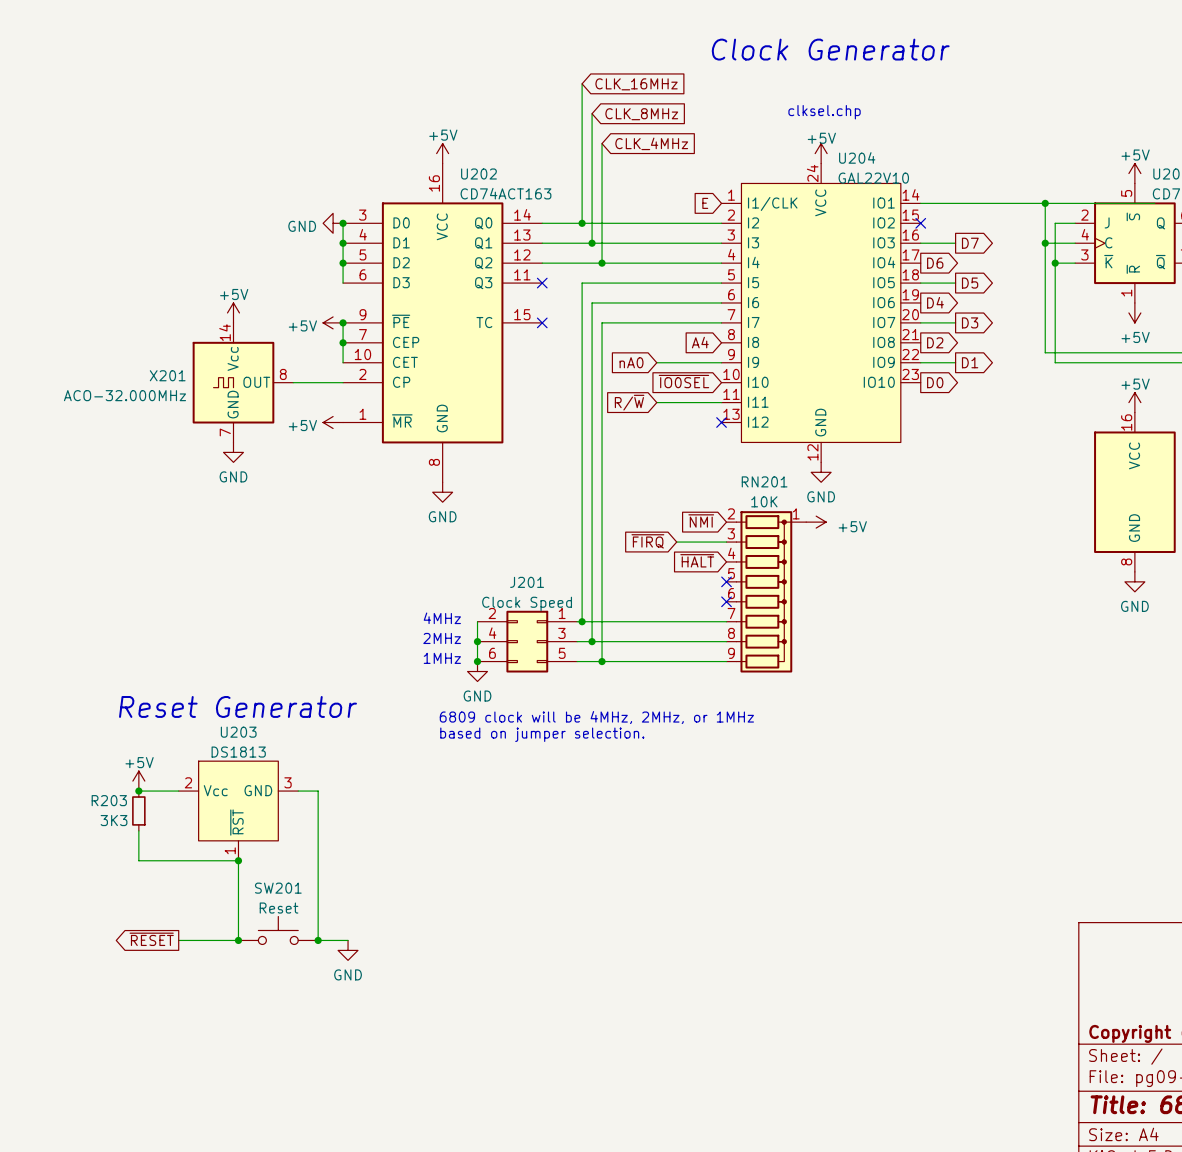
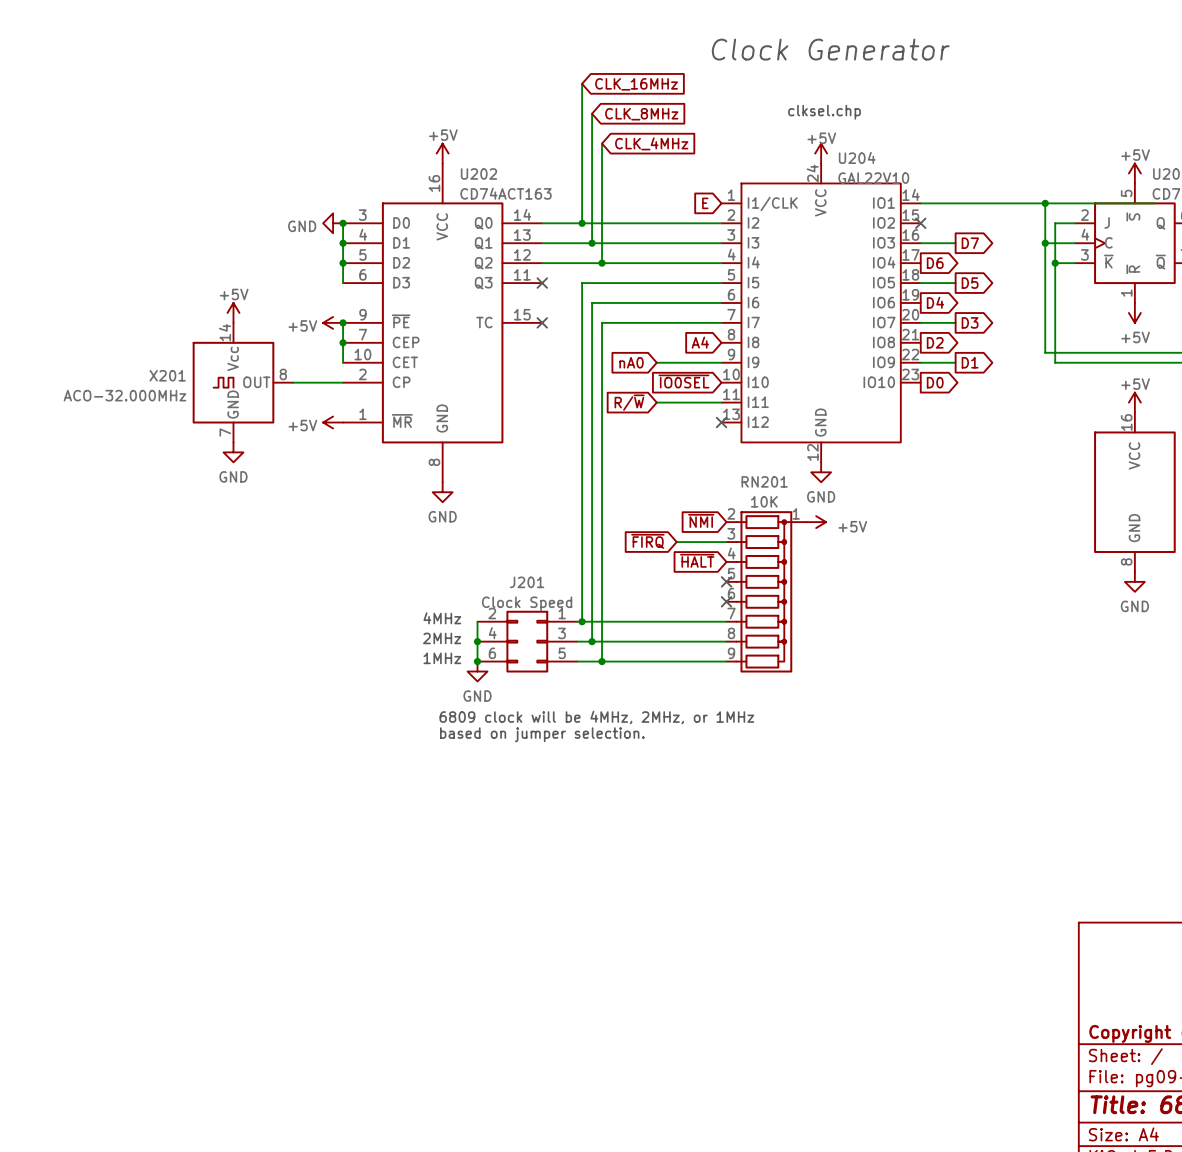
text: Reset Generator (238, 706) -> none
power symbol: +5V (138, 781) -> none
wire: (138, 791) (178, 791) -> none
junction: (138, 791) -> none
wire: (298, 791) (318, 791) (318, 940) (348, 940) -> none
R203: 3K3 (138, 810) -> none
U203: DS1813 (238, 810) -> none
wire: (138, 830) (138, 860) (238, 860) (238, 940) (178, 940) -> none
junction: (238, 860) -> none
SW201: Reset (278, 930) -> none
global label: ~{RESET} (151, 939) -> none
junction: (238, 940) -> none
junction: (318, 940) -> none
power symbol: GND (348, 950) -> none

